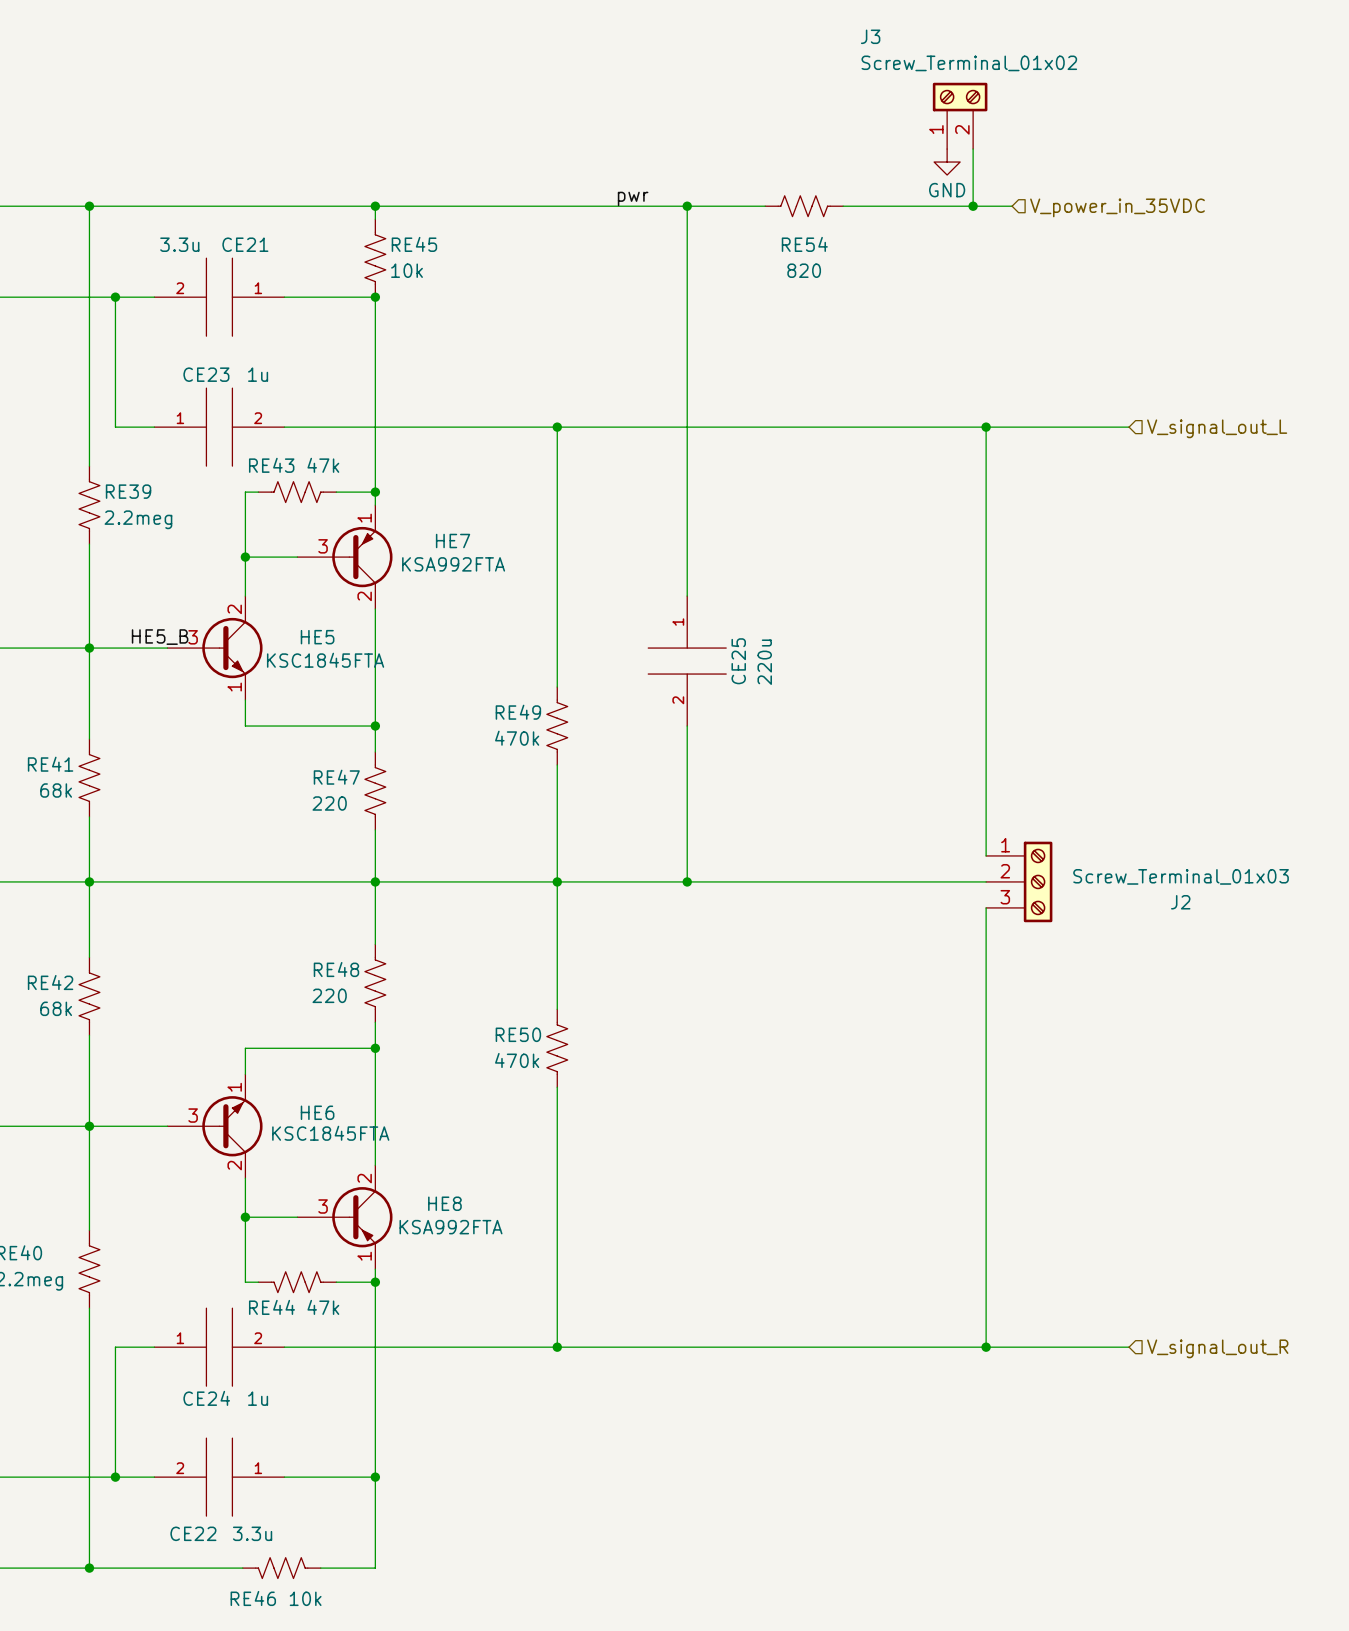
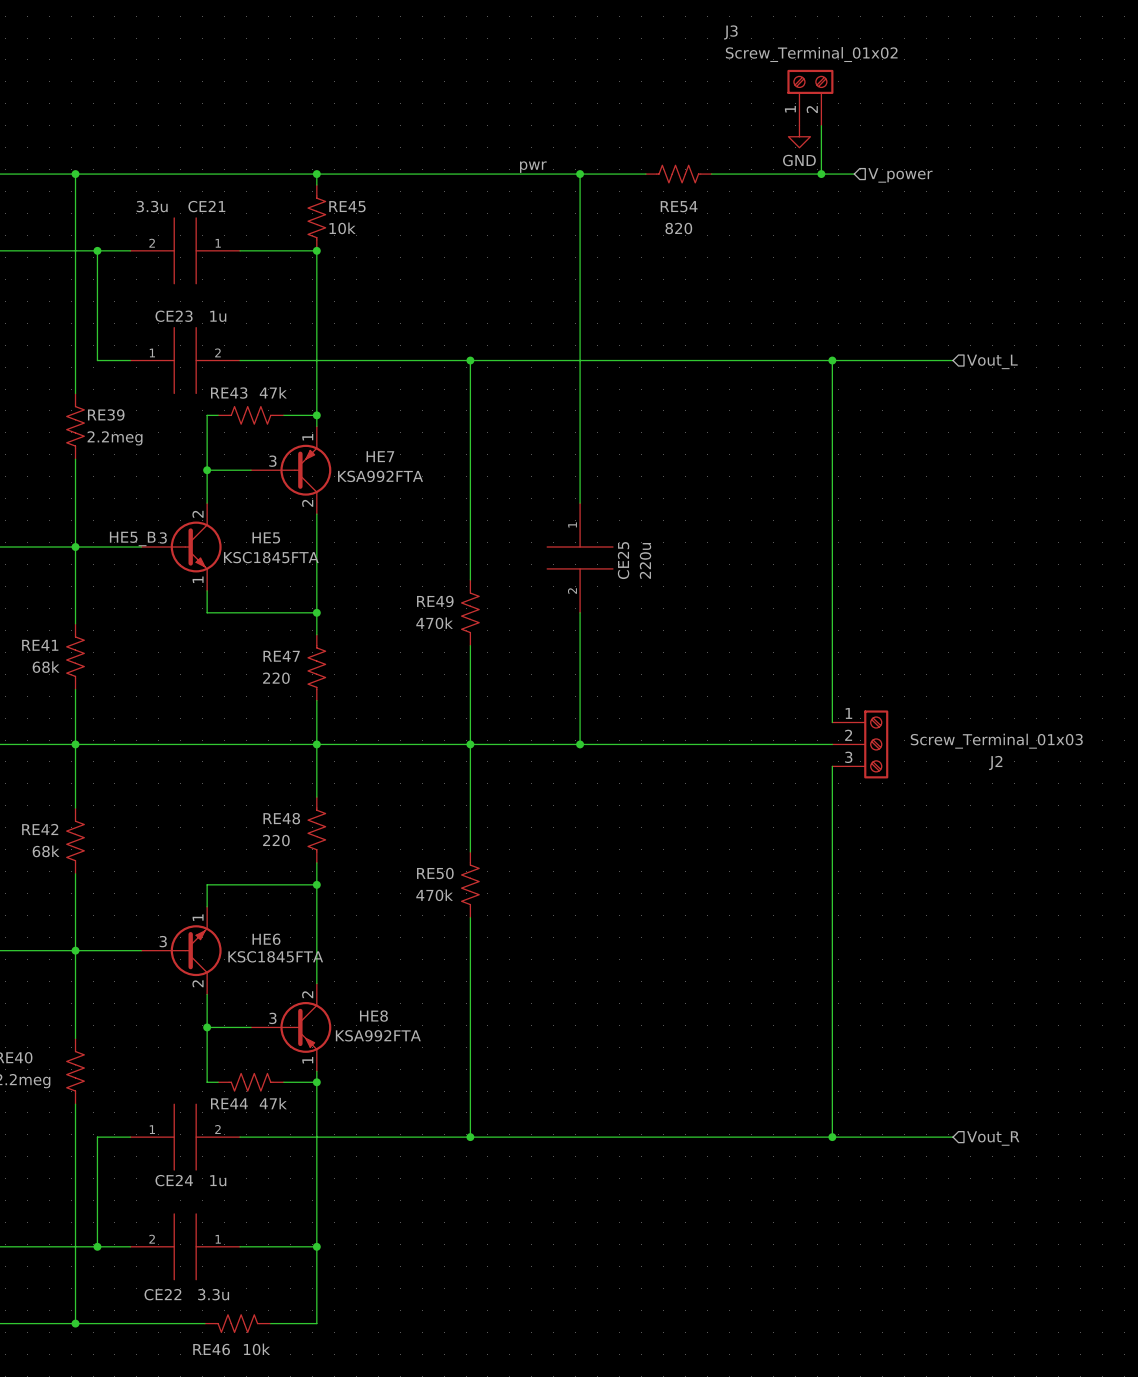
hierarchical label: V_power_in_35VDC (1117, 207) -> V_power (900, 175)
hierarchical label: V_signal_out_L (1217, 428) -> Vout_L (992, 361)
hierarchical label: V_signal_out_R (1217, 1348) -> Vout_R (993, 1138)

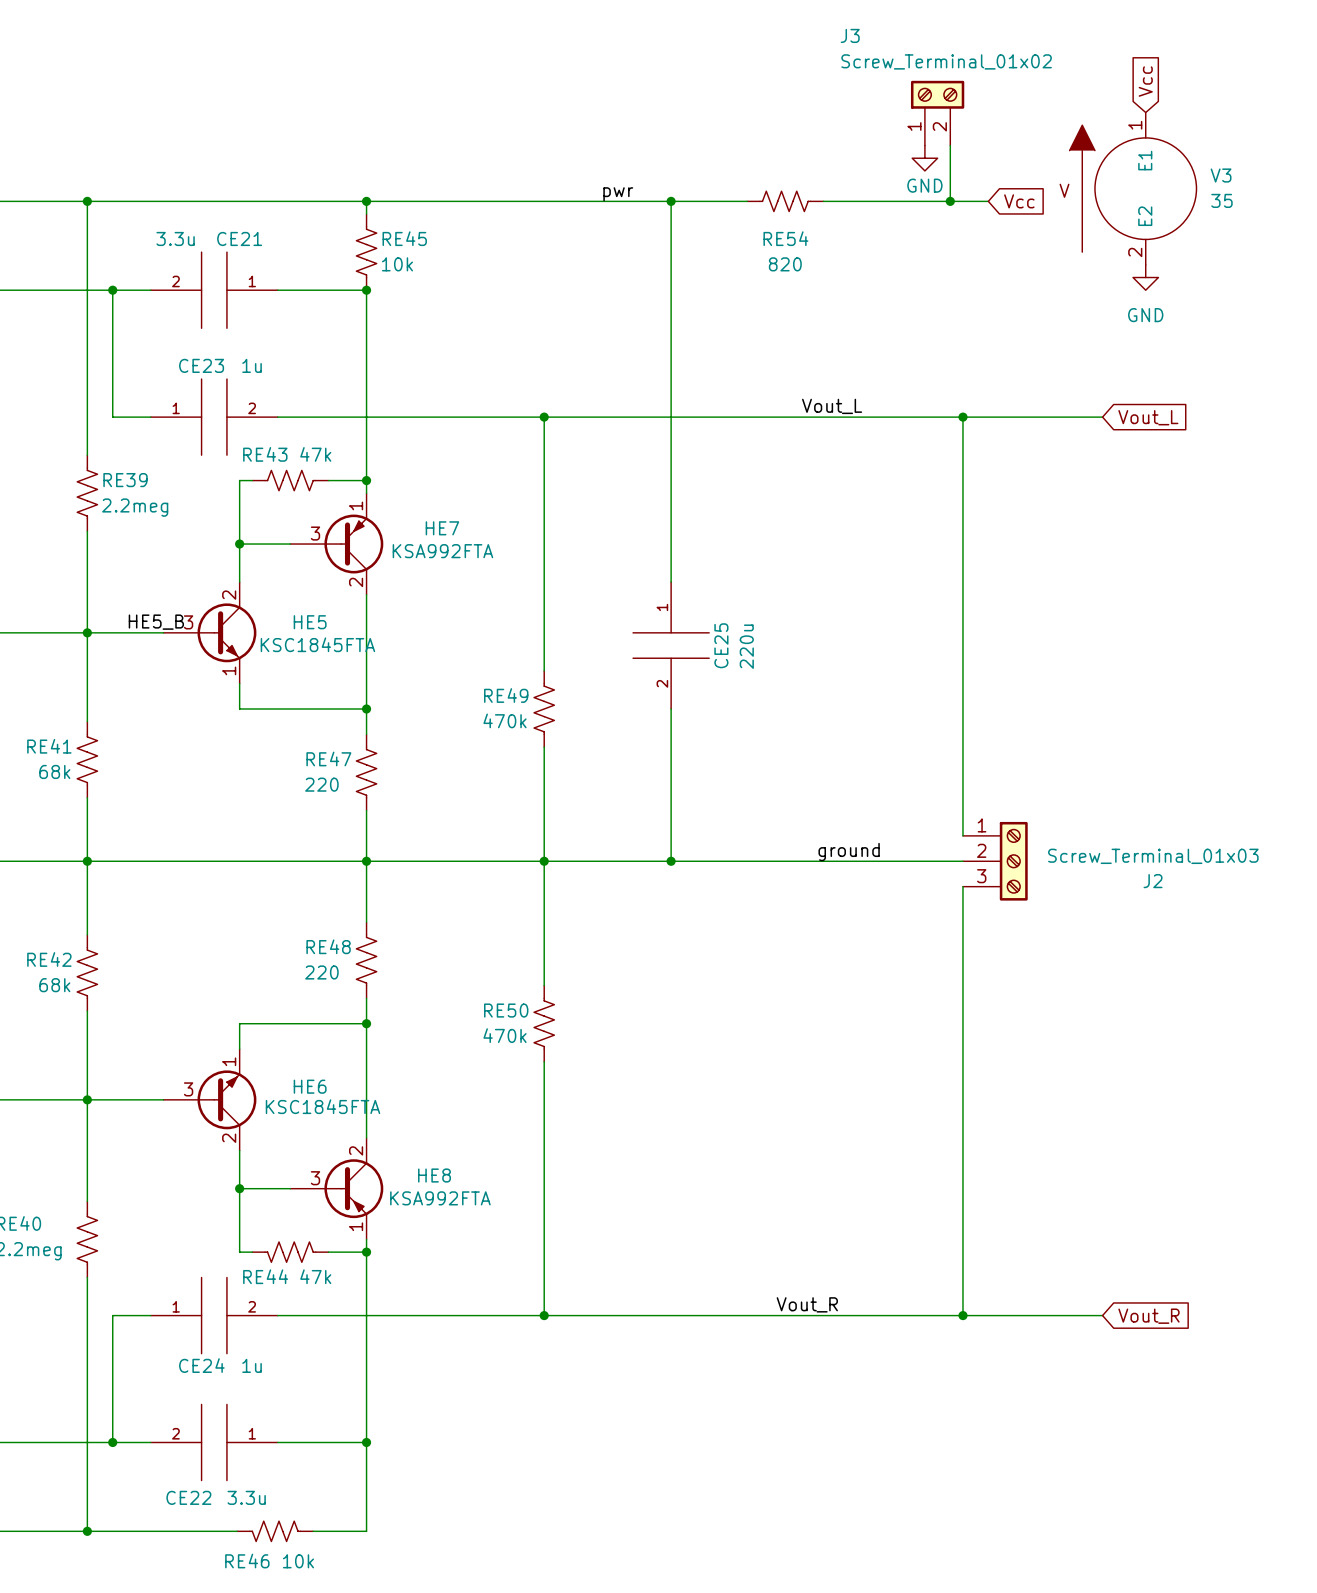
global label: none -> Vcc (1145, 81)
V3: none -> 35 (1133, 188)
global label: none -> Vcc (1019, 201)
hierarchical label: V_power (900, 175) -> none
power symbol: none -> GND (1145, 277)
label: none -> Vout_L (832, 406)
hierarchical label: Vout_L (992, 361) -> none
global label: none -> Vout_L (1148, 417)
label: none -> ground (849, 852)
label: none -> Vout_R (807, 1304)
global label: none -> Vout_R (1148, 1316)
hierarchical label: Vout_R (993, 1138) -> none

